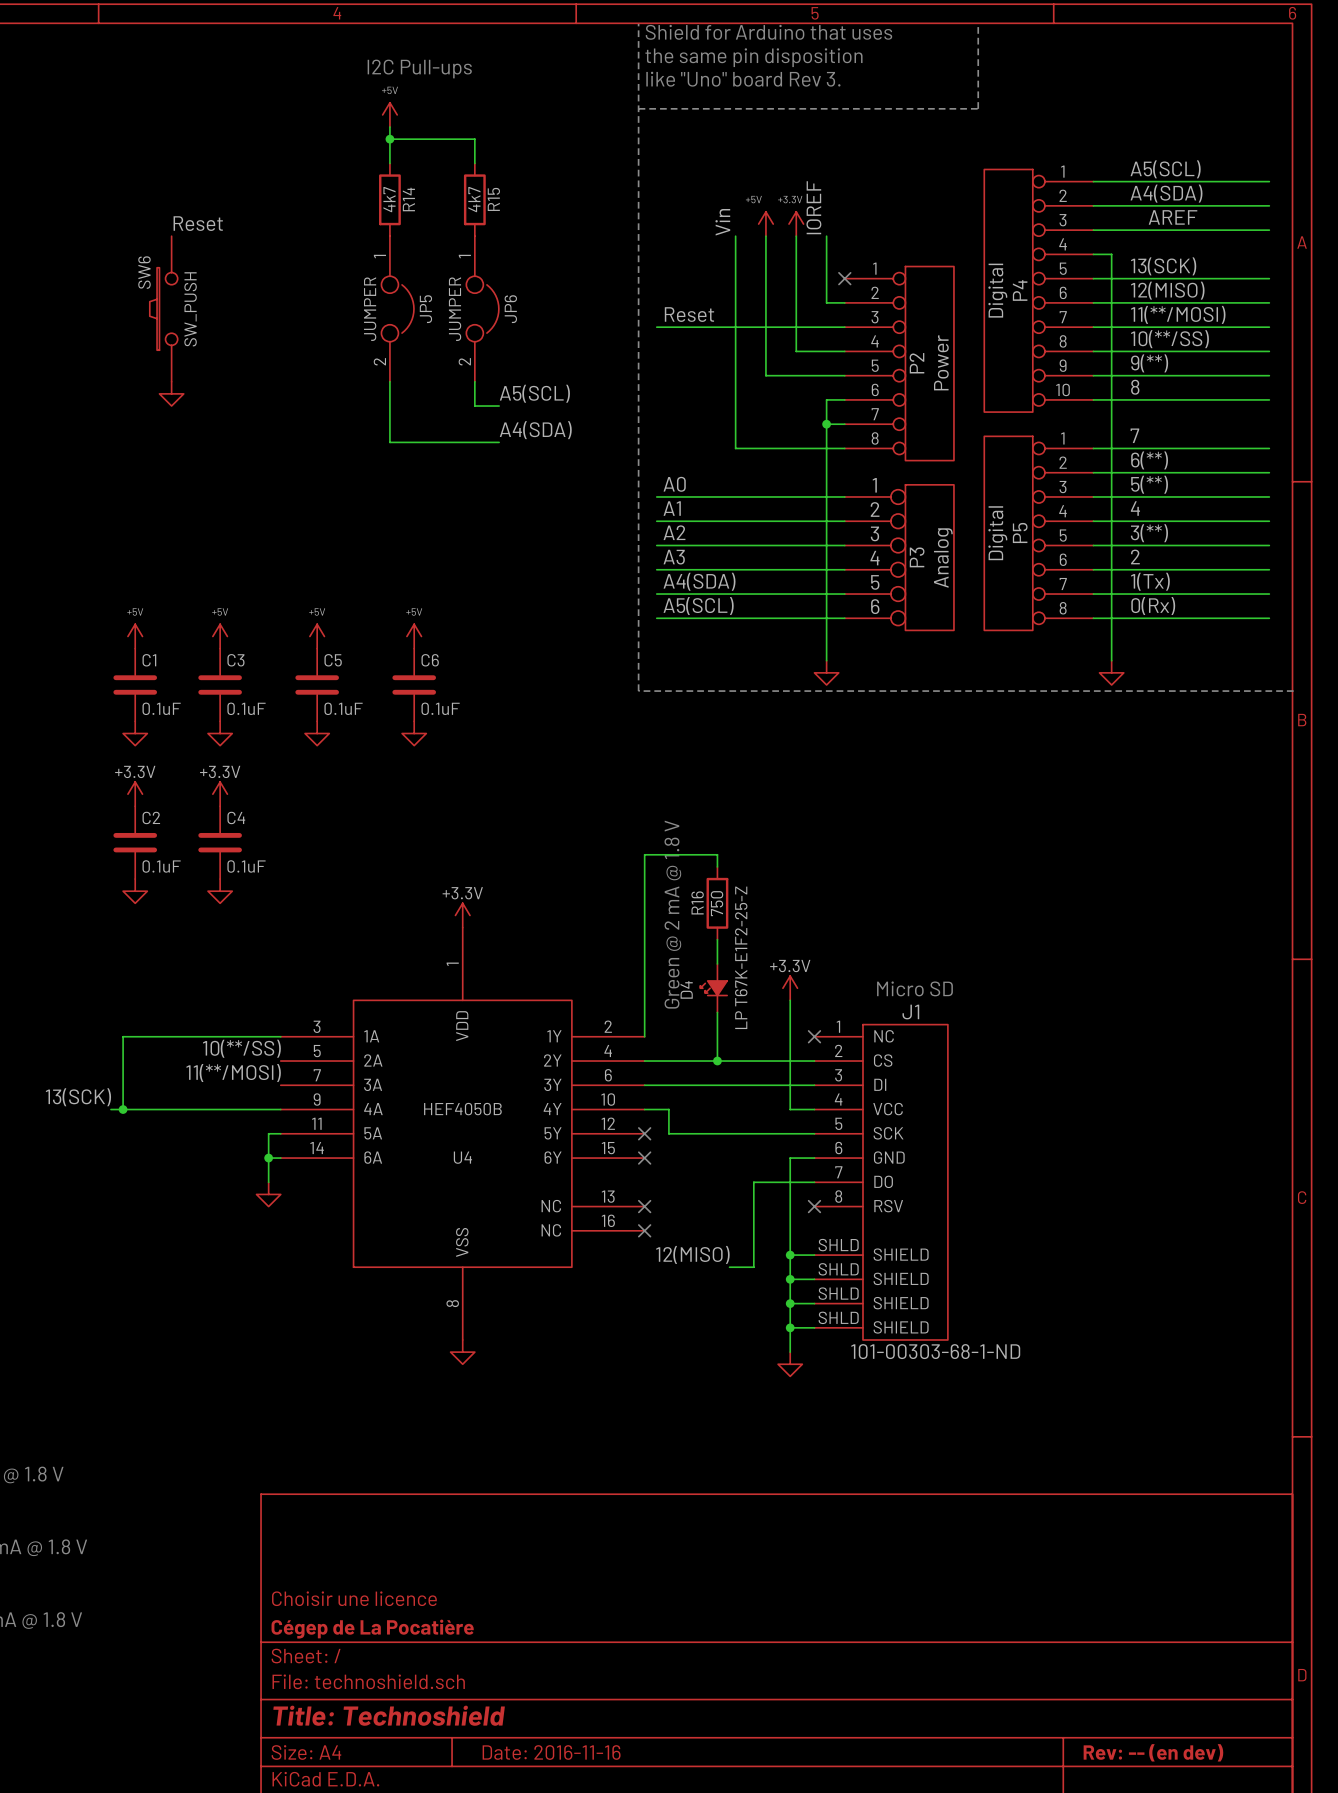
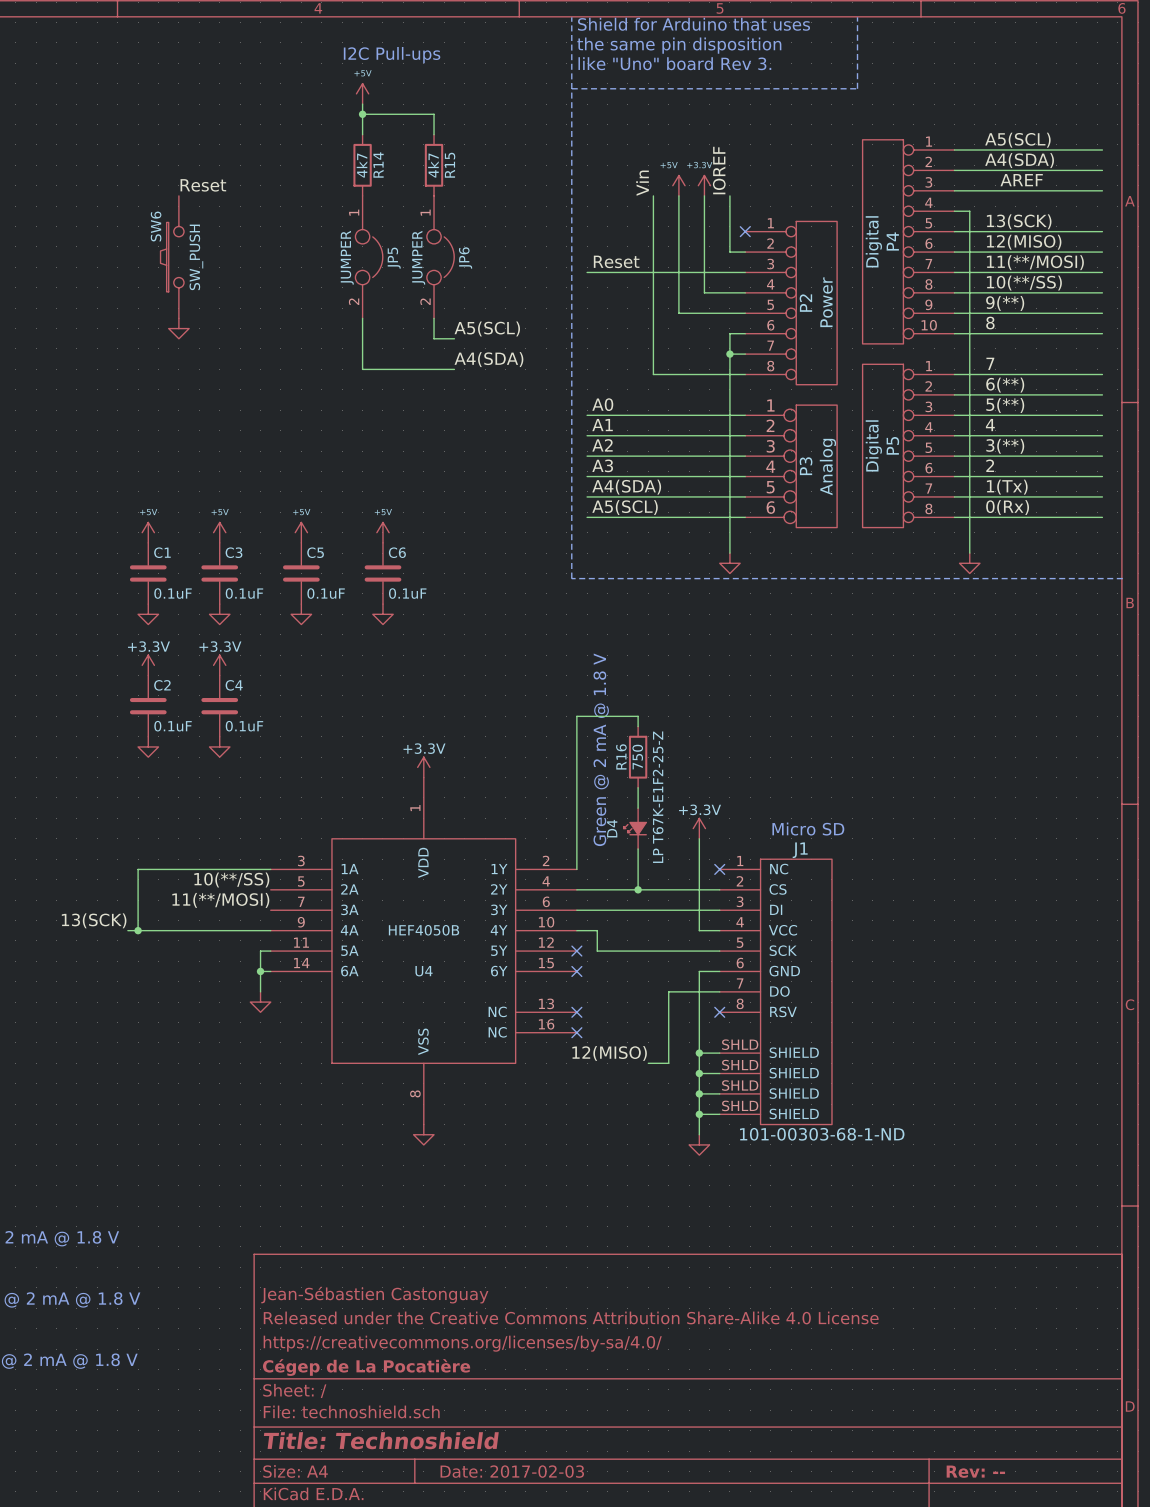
title block: none -> Jean-Sébastien Castonguay (374, 1295)
title block: none -> Released under the Creative Commons Attribution Share-Alike 4.0 License (571, 1317)
title block: Choisir une licence (354, 1598) -> https://creativecommons.org/licenses/by-sa/4.0/ (462, 1343)
title block: Date: 2016-11-16 (551, 1752) -> Date: 2017-02-03 (512, 1471)
title block: Rev: -- (en dev) (1153, 1752) -> Rev: -- (975, 1471)

